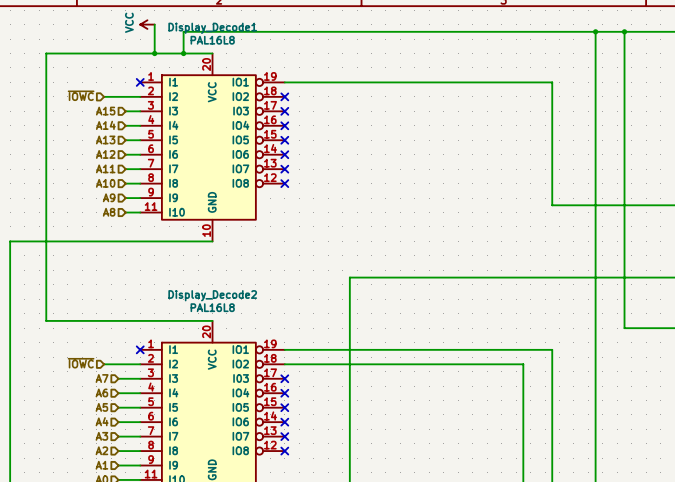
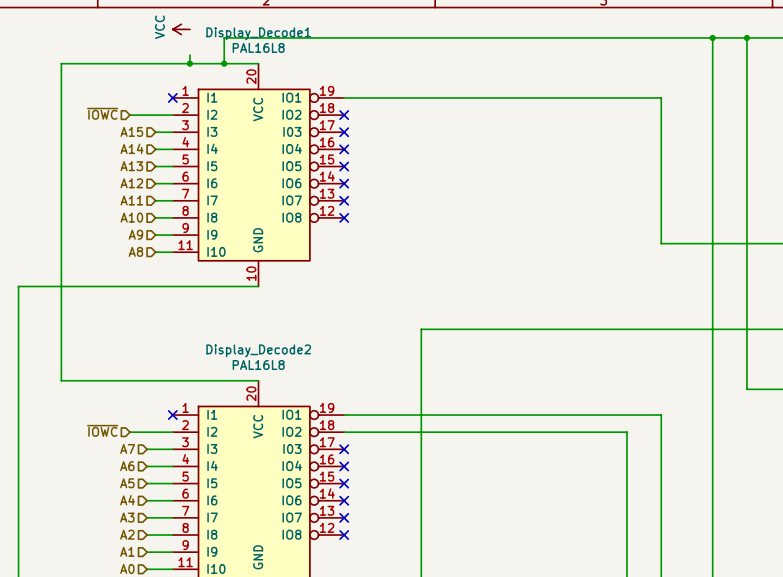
wire: (154, 24) (154, 46) -> none

